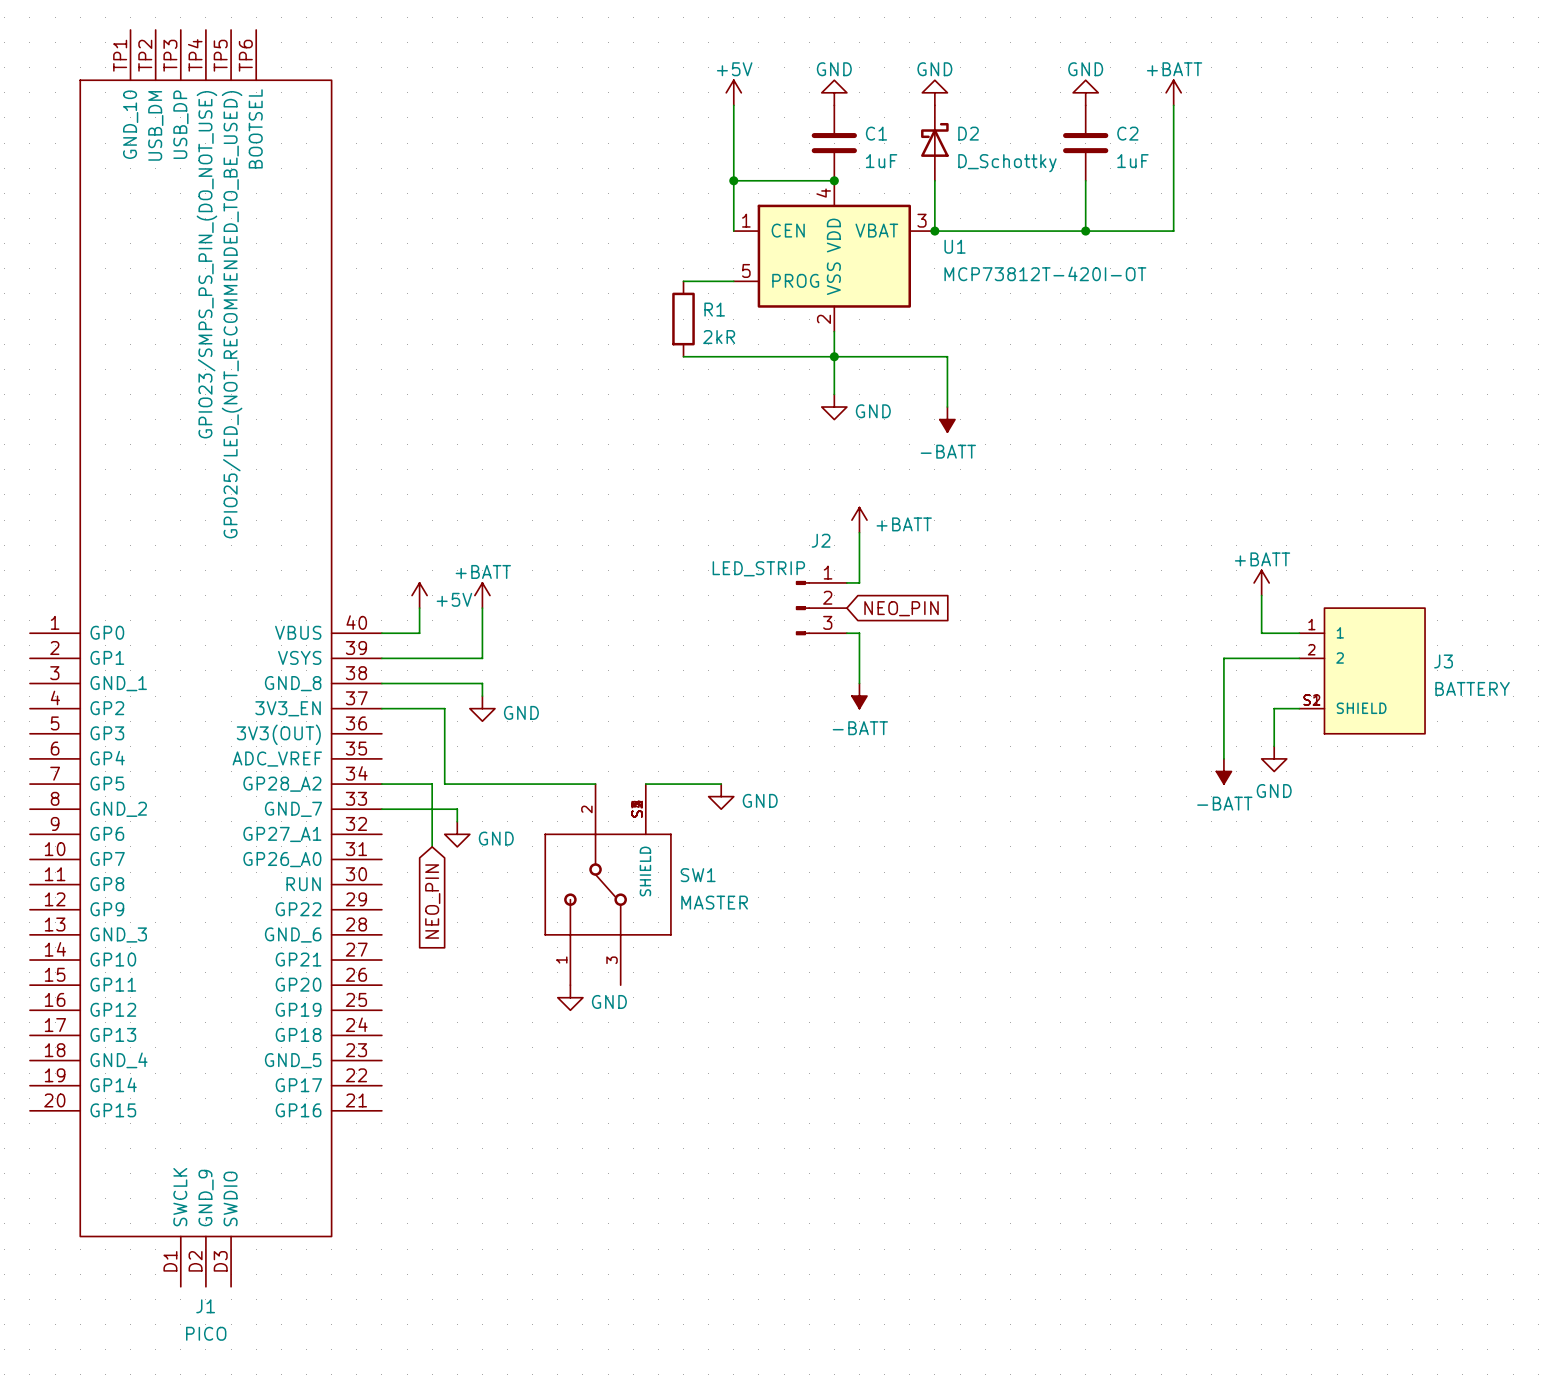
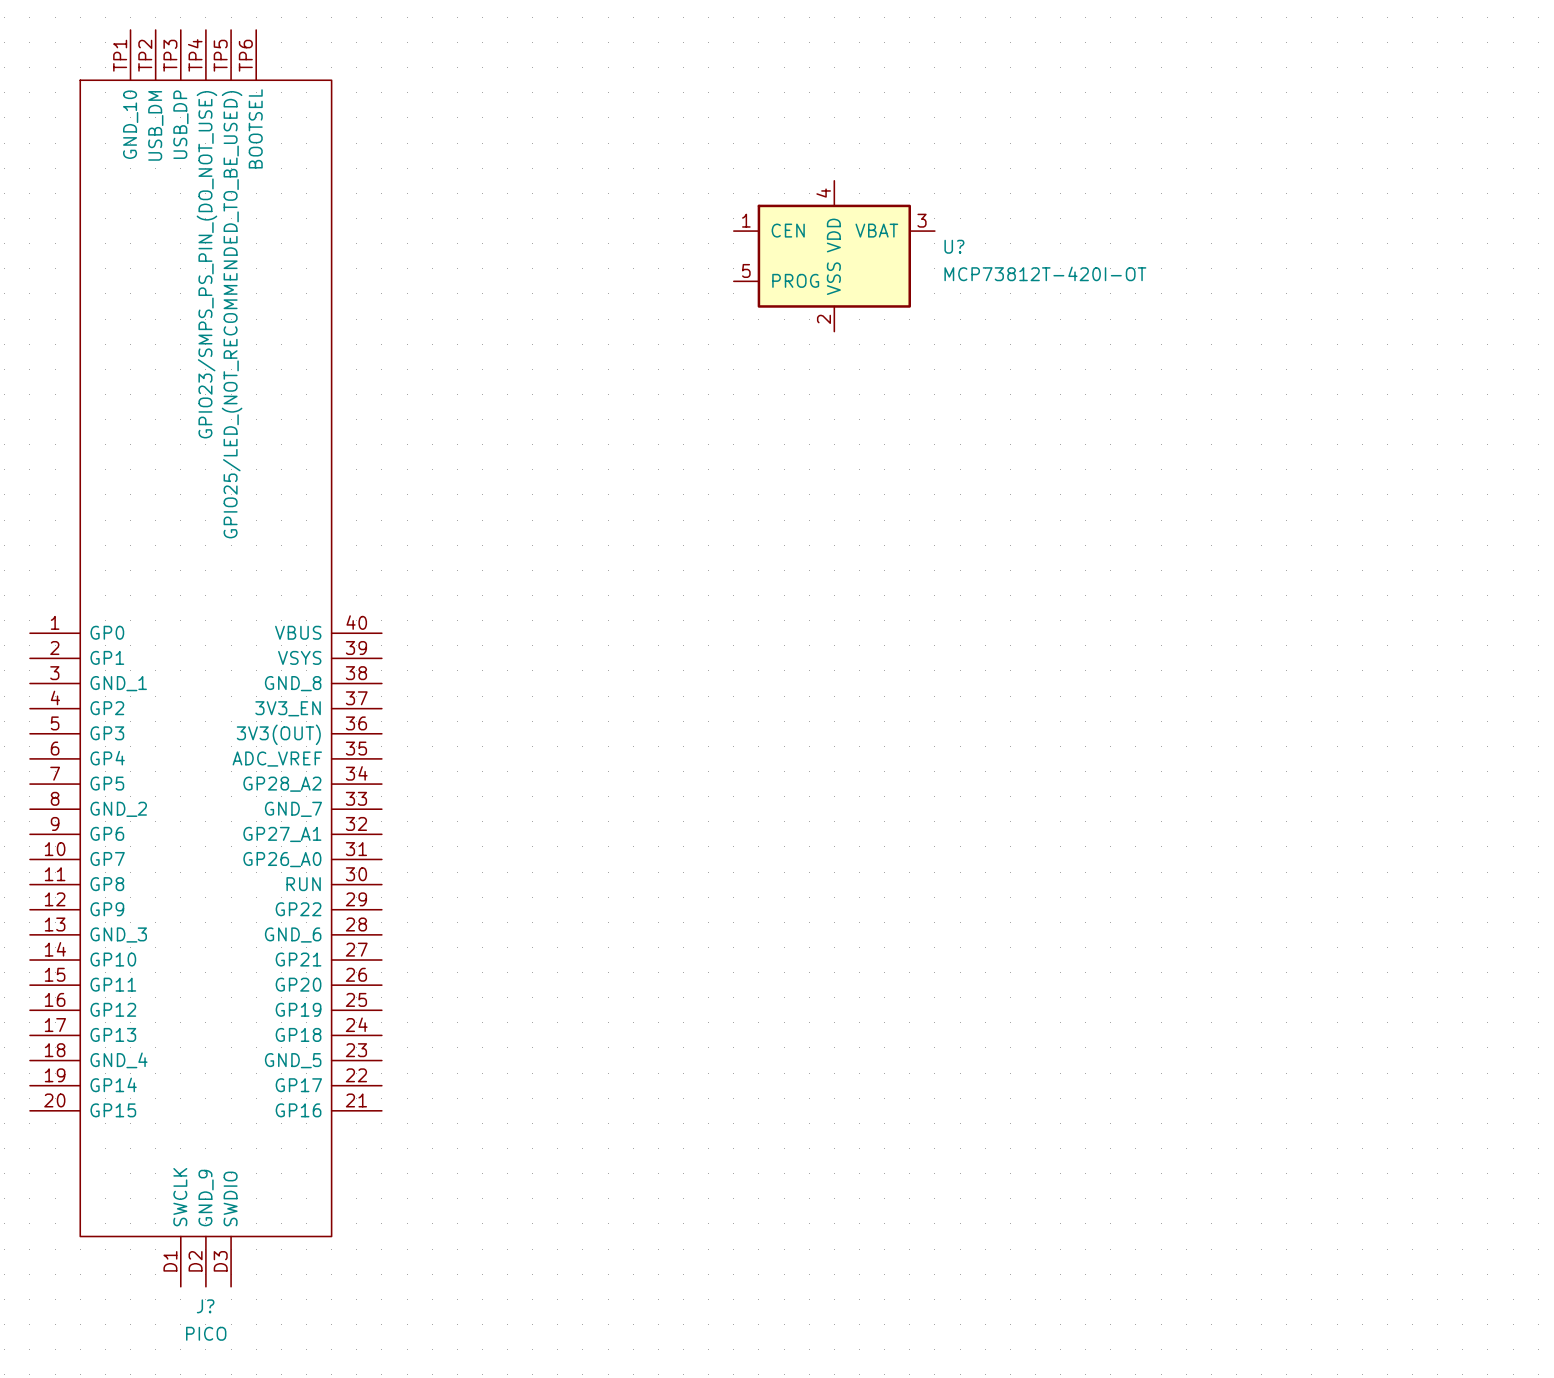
power symbol: +5V (733, 92) -> none
power symbol: GND (834, 92) -> none
power symbol: GND (934, 92) -> none
power symbol: GND (1085, 92) -> none
power symbol: +BATT (1173, 92) -> none
wire: (733, 105) (733, 231) -> none
wire: (1173, 105) (1173, 231) (934, 231) (934, 180) -> none
C1: 1uF (834, 143) -> none
D2: D_Schottky (934, 143) -> none
C2: 1uF (1085, 143) -> none
wire: (733, 180) (834, 180) -> none
junction: (733, 180) -> none
junction: (834, 180) -> none
wire: (1085, 180) (1085, 231) -> none
junction: (934, 231) -> none
junction: (1085, 231) -> none
U1 name: U1 (955, 246) -> U? (954, 246)
wire: (683, 281) (733, 281) -> none
R1: 2kR (683, 319) -> none
wire: (834, 331) (834, 394) -> none
wire: (683, 356) (947, 356) (947, 407) -> none
junction: (834, 356) -> none
power symbol: GND (834, 407) -> none
power symbol: -BATT (947, 419) -> none
power symbol: +BATT (859, 520) -> none
wire: (859, 532) (859, 582) (846, 582) -> none
power symbol: +BATT (1261, 582) -> none
power symbol: +5V (419, 595) -> none
power symbol: +BATT (482, 595) -> none
wire: (1261, 595) (1261, 633) (1299, 633) -> none
wire: (419, 608) (419, 633) (381, 633) -> none
wire: (482, 608) (482, 658) (381, 658) -> none
J2: LED_STRIP (821, 608) -> none
global label: NEO_PIN (901, 608) -> none
wire: (846, 633) (859, 633) (859, 683) -> none
wire: (1299, 658) (1223, 658) (1223, 758) -> none
J3: BATTERY (1362, 670) -> none
wire: (381, 683) (482, 683) (482, 696) -> none
power symbol: -BATT (859, 696) -> none
wire: (381, 708) (444, 708) (444, 784) (595, 784) -> none
power symbol: GND (482, 708) -> none
wire: (1299, 708) (1274, 708) (1274, 746) -> none
power symbol: GND (1274, 758) -> none
power symbol: -BATT (1223, 771) -> none
wire: (381, 784) (432, 784) (432, 846) -> none
wire: (645, 784) (721, 784) -> none
power symbol: GND (721, 796) -> none
wire: (381, 809) (457, 809) (457, 821) -> none
power symbol: GND (457, 834) -> none
SW1: MASTER (608, 884) -> none
global label: NEO_PIN (432, 901) -> none
power symbol: GND (570, 997) -> none
J1 name: J1 (205, 1306) -> J? (205, 1306)

